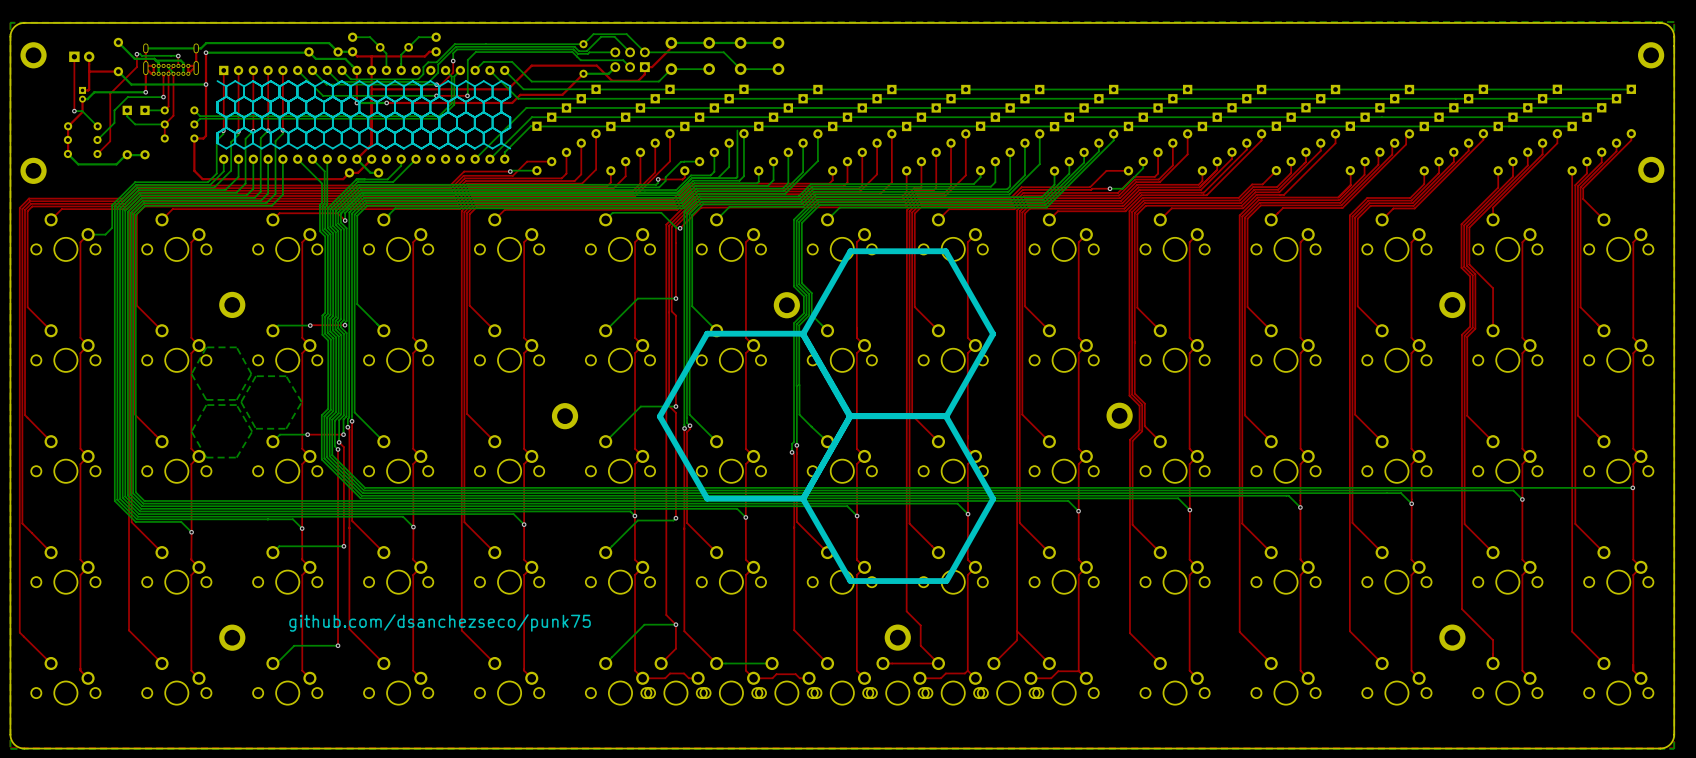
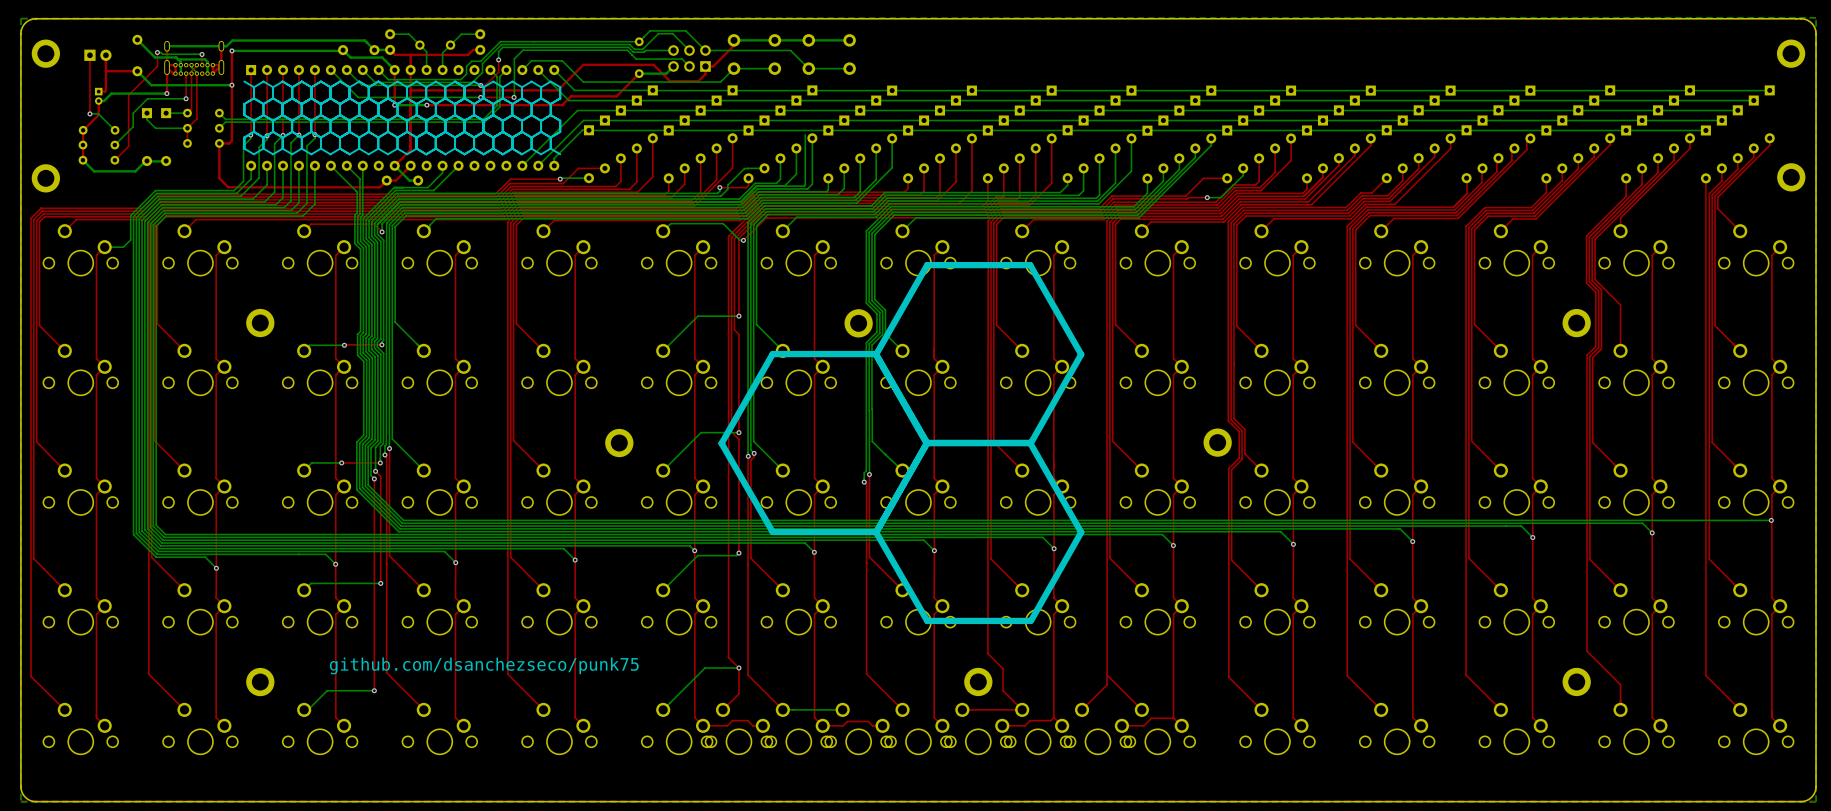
bottom zone outline: (236, 347) (251, 374) (236, 399) (206, 399) (191, 374) (206, 347) (236, 347) -> none
bottom zone outline: (286, 376) (301, 402) (286, 428) (255, 428) (241, 402) (255, 376) (286, 376) -> none
bottom zone outline: (236, 405) (252, 431) (236, 457) (206, 457) (191, 431) (206, 405) (236, 405) -> none

